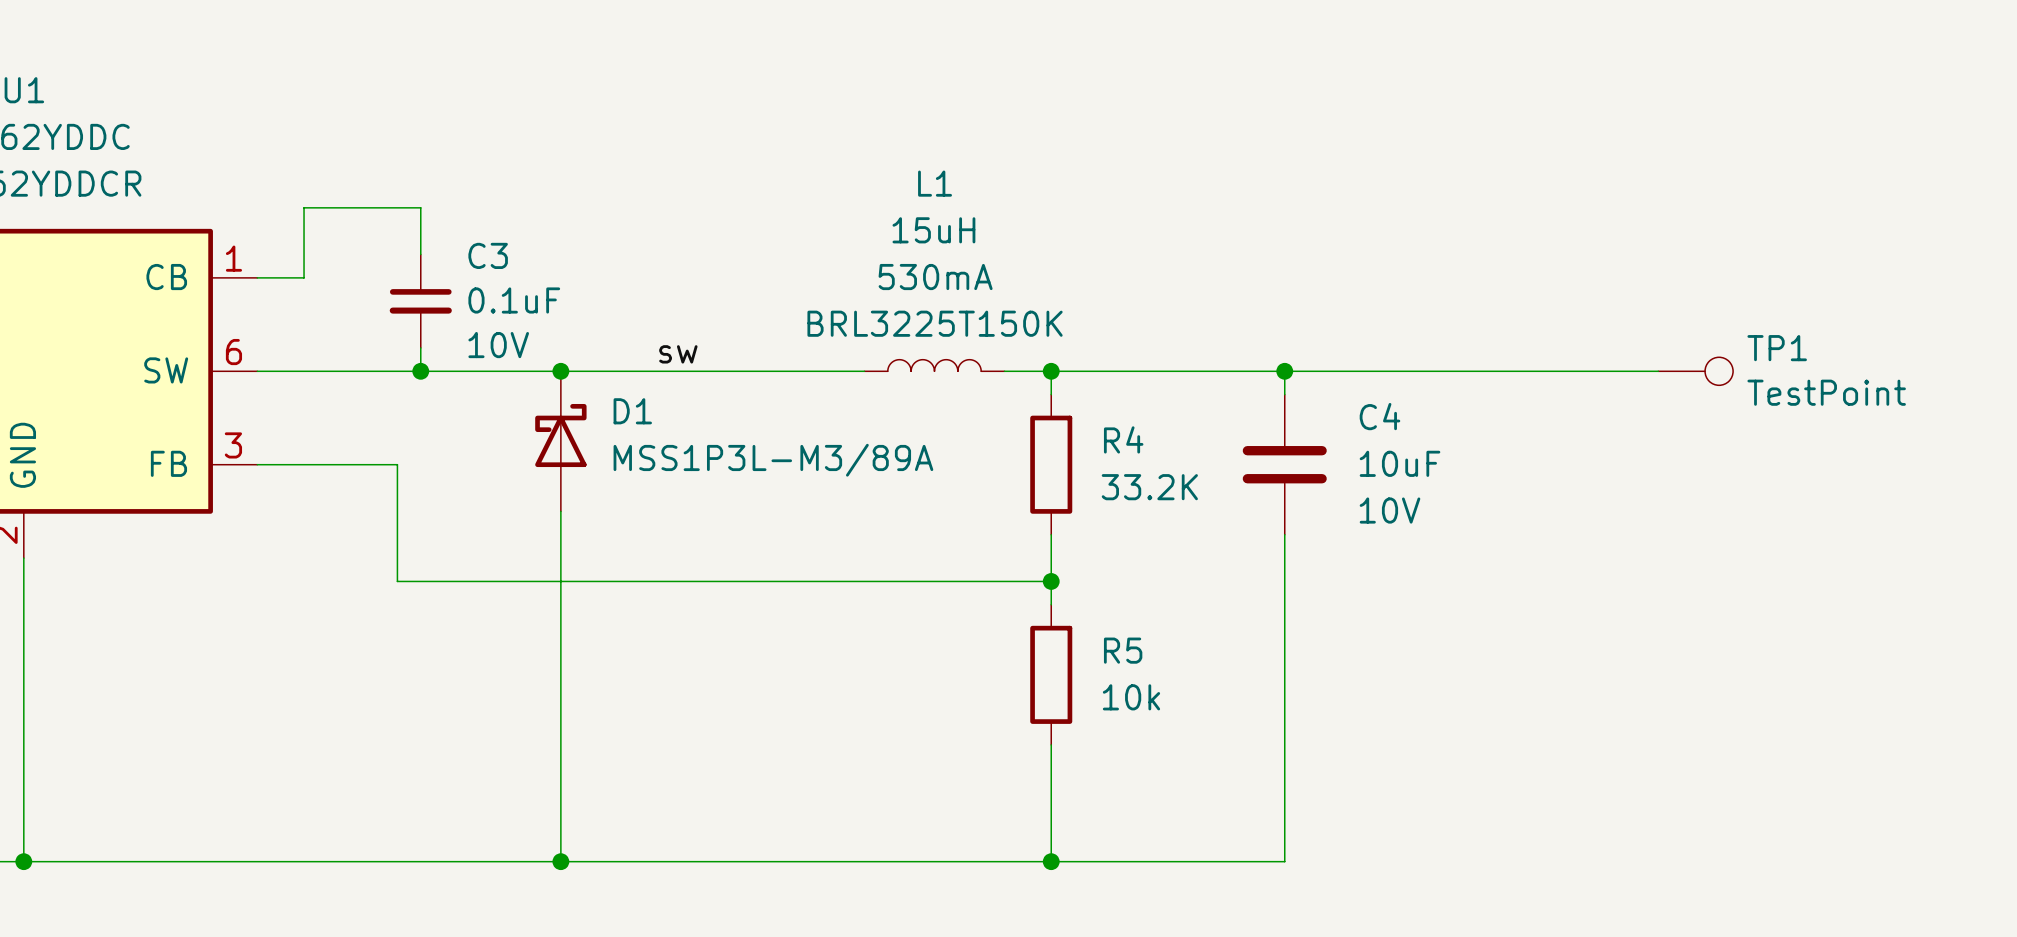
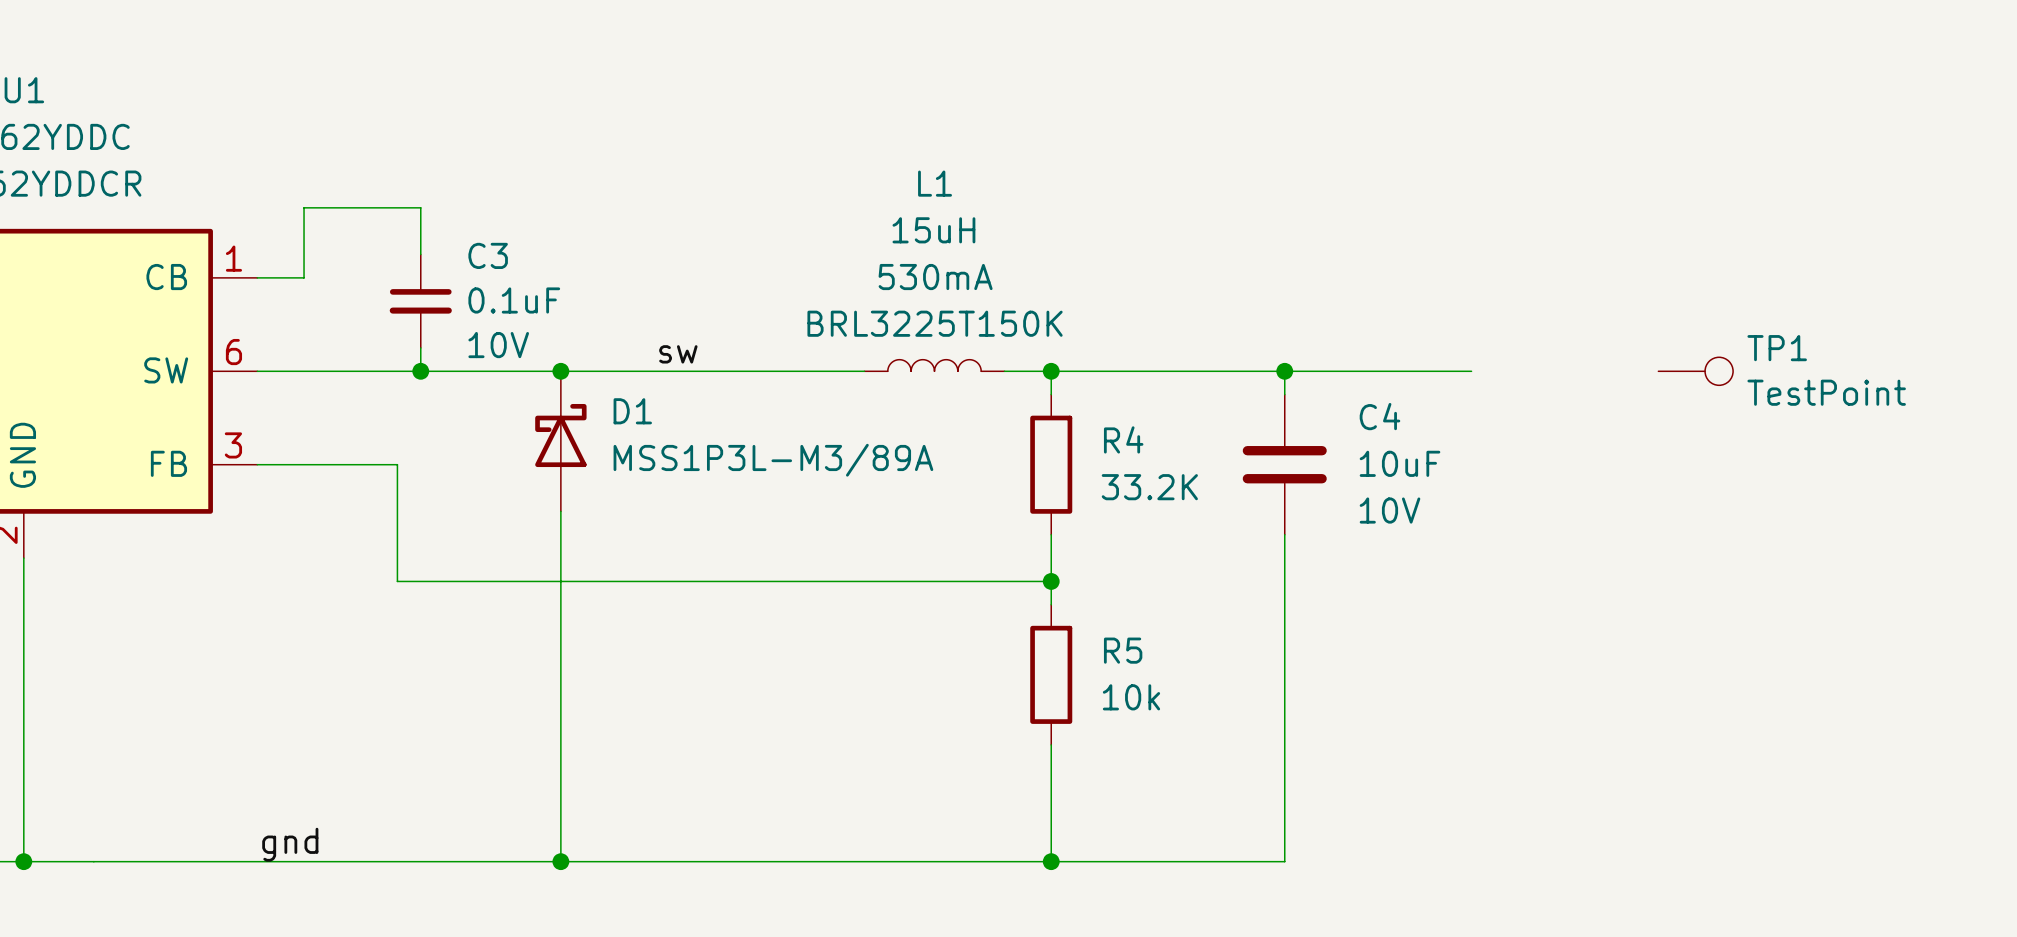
wire: (1471, 371) (1658, 371) -> none
label: none -> gnd (290, 844)

